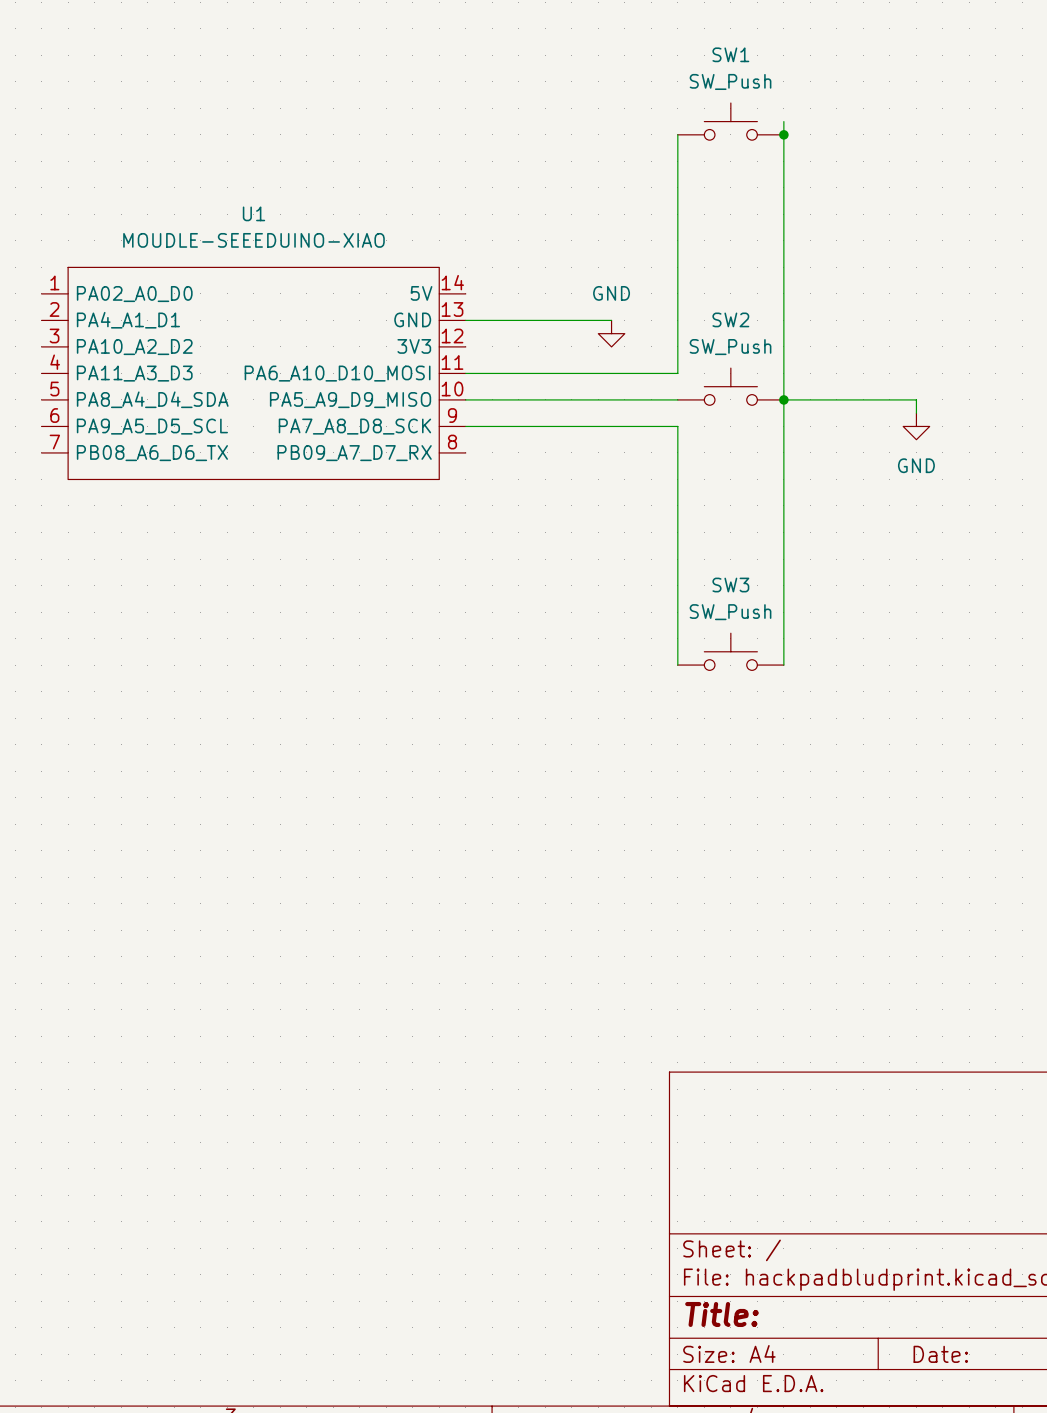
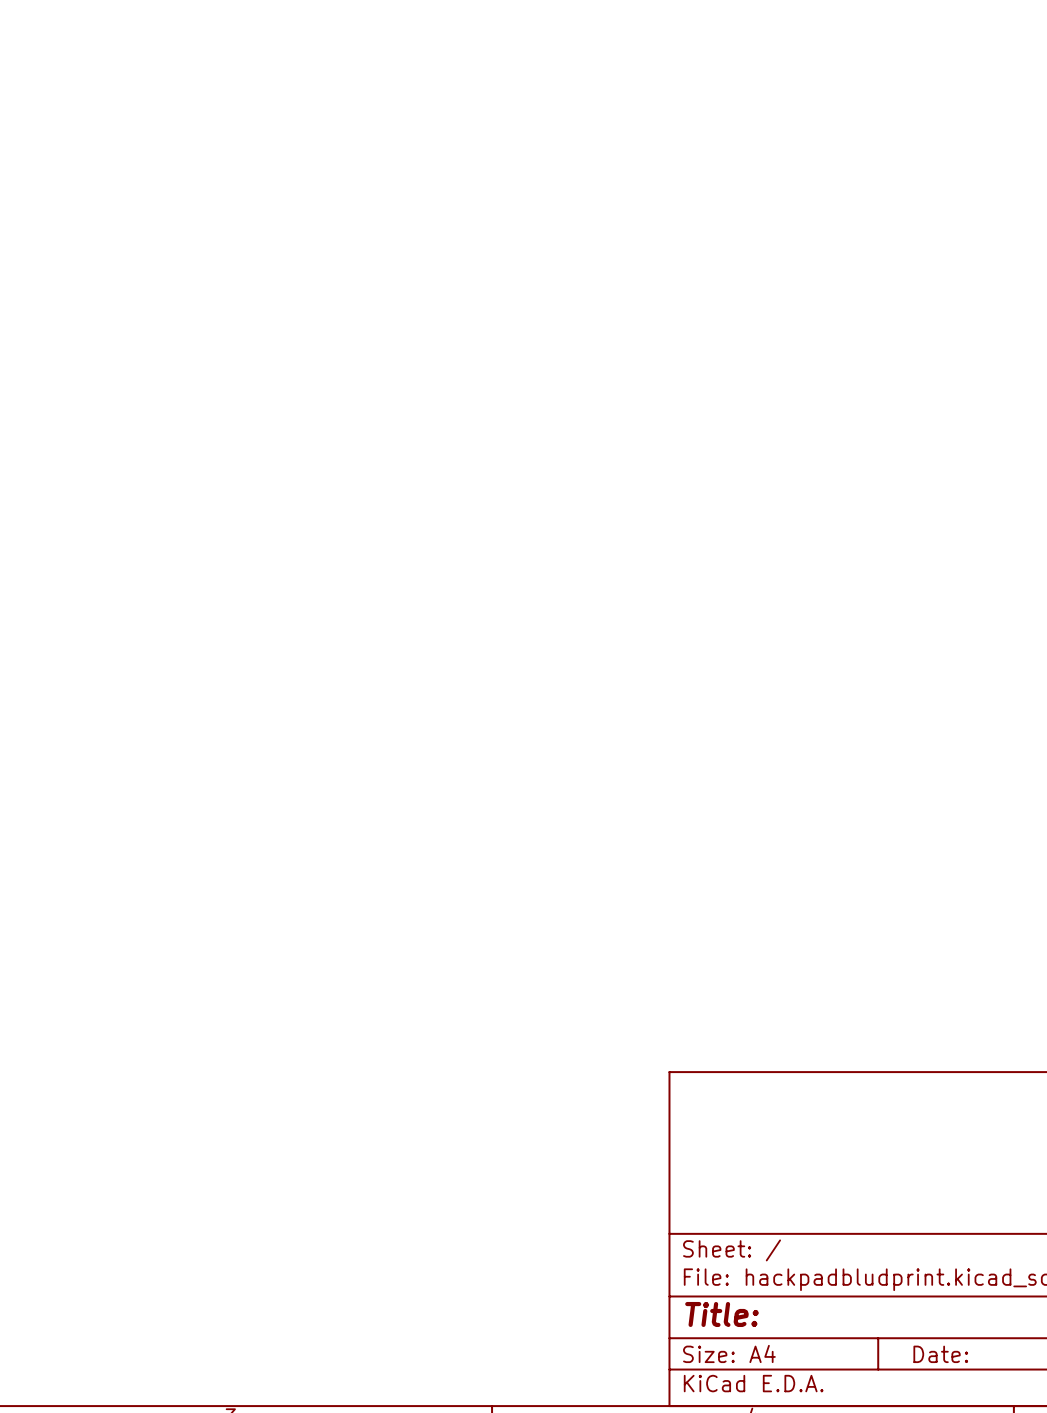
SW1: SW_Push (730, 121) -> none
wire: (783, 121) (783, 665) -> none
wire: (677, 134) (677, 373) (465, 373) -> none
junction: (783, 134) -> none
wire: (465, 320) (611, 320) -> none
power symbol: GND (611, 333) -> none
U1: MOUDLE-SEEEDUINO-XIAO (253, 373) -> none
SW2: SW_Push (730, 386) -> none
wire: (465, 399) (677, 399) -> none
wire: (783, 399) (916, 399) (916, 413) -> none
junction: (783, 399) -> none
wire: (465, 426) (677, 426) (677, 665) -> none
power symbol: GND (916, 426) -> none
SW3: SW_Push (730, 651) -> none

